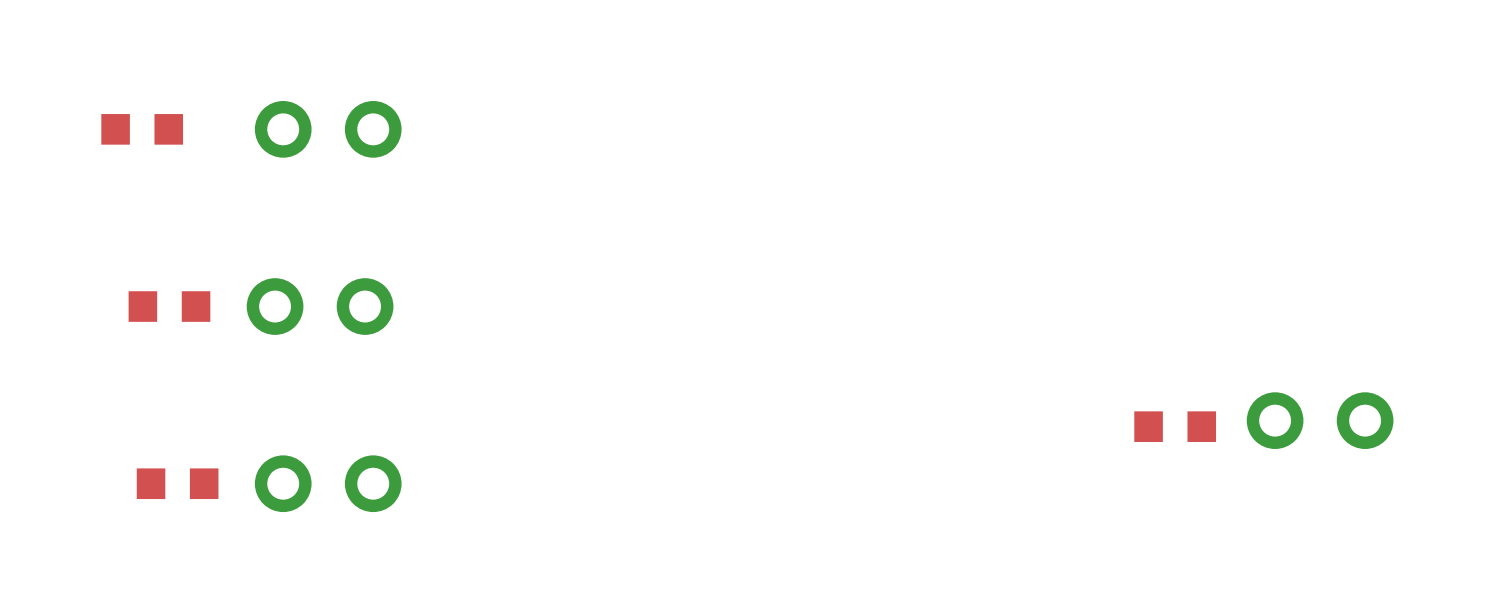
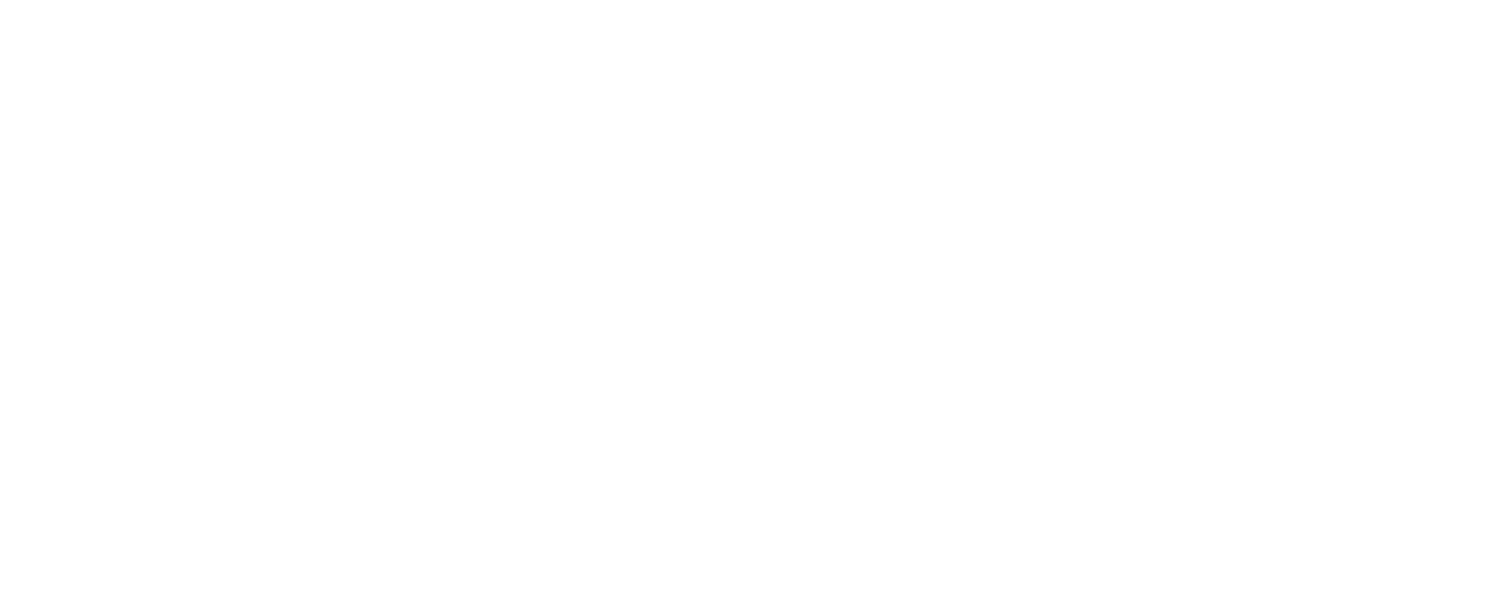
part: (142, 129) -> none
part: (328, 129) -> none
part: (169, 306) -> none
part: (320, 306) -> none
part: (1320, 420) -> none
part: (1175, 426) -> none
part: (177, 483) -> none
part: (328, 483) -> none

